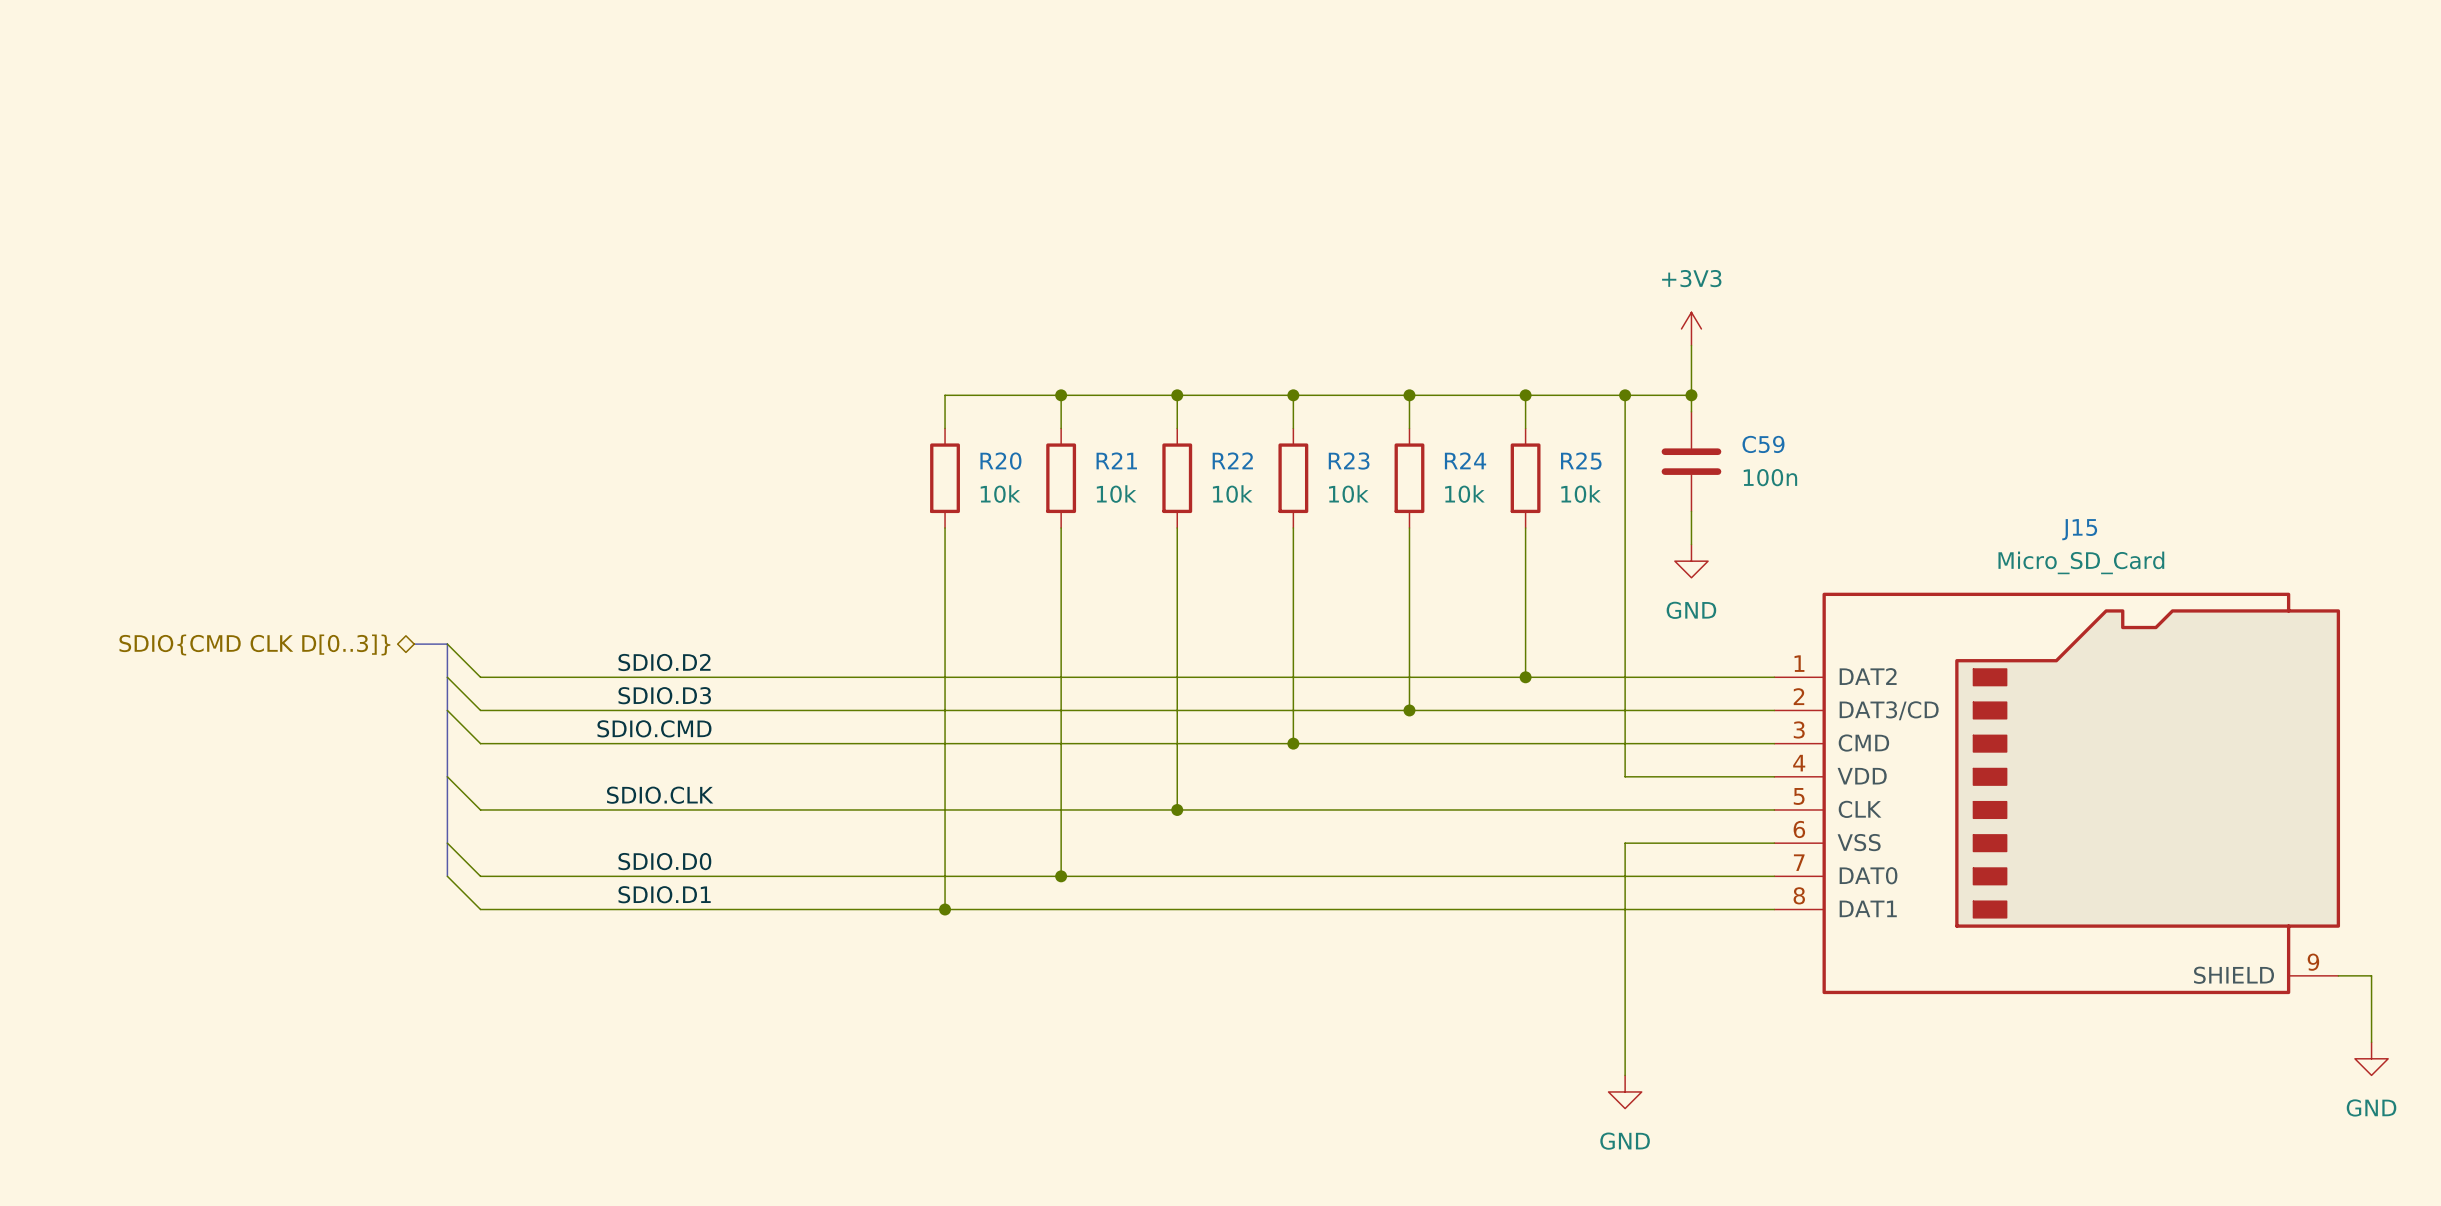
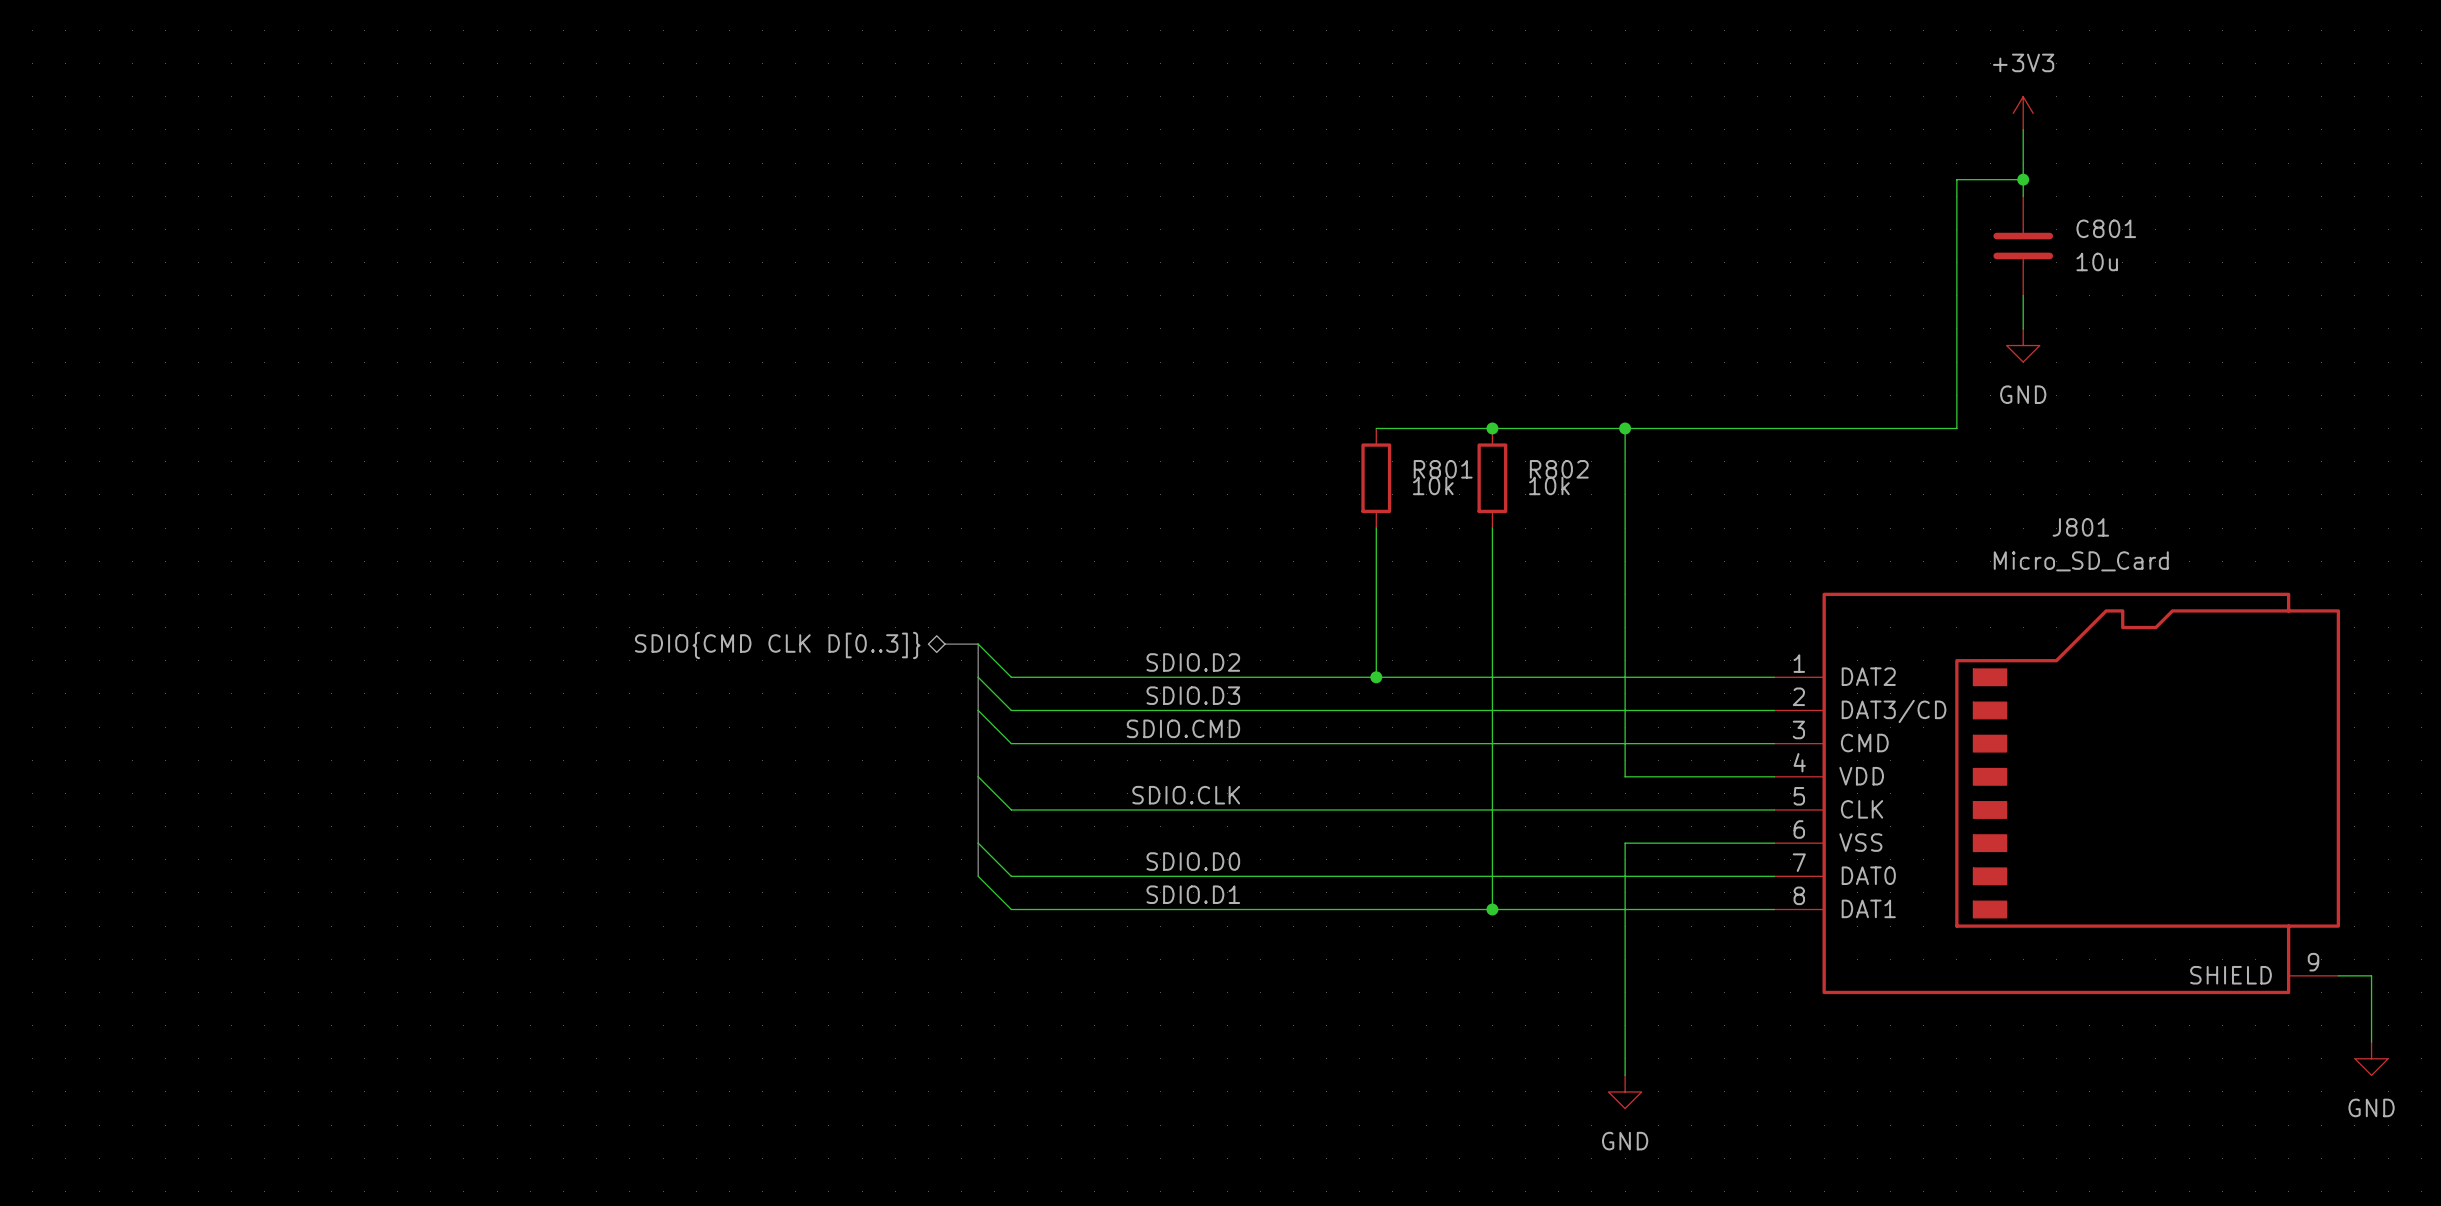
power symbol: none -> +3V3 (2023, 113)
wire: none -> (2023, 129) (2023, 196)
wire: none -> (2023, 179) (1956, 179) (1956, 428) (1376, 428)
junction: none -> (2023, 179)
C801: none -> 10u (2023, 246)
wire: none -> (2023, 295) (2023, 328)
power symbol: +3V3 (1691, 328) -> none
wire: (1691, 345) (1691, 411) -> none
power symbol: none -> GND (2023, 345)
wire: (1061, 395) (1061, 428) -> none
junction: (1061, 395) -> none
wire: (1177, 395) (1177, 428) -> none
junction: (1177, 395) -> none
wire: (1293, 395) (1293, 428) -> none
junction: (1293, 395) -> none
wire: (1409, 395) (1409, 428) -> none
junction: (1409, 395) -> none
wire: (1525, 395) (1525, 428) -> none
junction: (1525, 395) -> none
wire: (1625, 395) (1625, 428) -> none
junction position: (1625, 395) -> (1625, 428)
wire: (1691, 395) (945, 395) (945, 428) -> none
junction: (1691, 395) -> none
junction: none -> (1492, 428)
C59: 100n (1691, 461) -> none
R20: 10k (945, 478) -> none
R21: 10k (1061, 478) -> none
R22: 10k (1177, 478) -> none
R23: 10k (1293, 478) -> none
R801: none -> 10k (1376, 478)
R24: 10k (1409, 478) -> none
R802: none -> 10k (1492, 478)
R25: 10k (1525, 478) -> none
wire: (1691, 511) (1691, 544) -> none
wire: (945, 528) (945, 909) -> none
wire: (1061, 528) (1061, 876) -> none
wire: (1177, 528) (1177, 809) -> none
wire: (1293, 528) (1293, 743) -> none
wire: (1409, 528) (1409, 710) -> none
wire: none -> (1492, 528) (1492, 909)
wire: (1525, 528) (1525, 677) -> (1376, 528) (1376, 677)
J15 name: J15 (2079, 529) -> J801 (2080, 527)
power symbol: GND (1691, 561) -> none
bus: (414, 644) (447, 644) (447, 876) -> none
wire: (447, 644) (480, 677) (1011, 677) -> (978, 644) (1011, 677)
bus: none -> (945, 644) (978, 644) (978, 876)
hierarchical label: SDIO{CMD CLK D[0..3]} (254, 645) -> none
hierarchical label: none -> SDIO{CMD CLK D[0..3]} (777, 645)
label: SDIO.D2 (664, 662) -> none
label: none -> SDIO.D2 (1193, 662)
wire: (447, 677) (480, 710) (1011, 710) -> (978, 677) (1011, 710)
junction: (1525, 677) -> none
label: SDIO.D3 (664, 695) -> none
label: none -> SDIO.D3 (1193, 695)
wire: (447, 710) (480, 743) (1011, 743) -> (978, 710) (1011, 743)
junction position: (1409, 710) -> (1376, 677)
label: SDIO.CMD (654, 728) -> none
label: none -> SDIO.CMD (1183, 728)
junction: (1293, 743) -> none
wire: (447, 776) (480, 809) (1011, 809) -> (978, 776) (1011, 809)
label: SDIO.CLK (660, 795) -> none
label: none -> SDIO.CLK (1186, 795)
junction: (1177, 809) -> none
wire: (447, 843) (480, 876) (1011, 876) -> (978, 843) (1011, 876)
label: SDIO.D0 (664, 861) -> none
label: none -> SDIO.D0 (1193, 861)
wire: (447, 876) (480, 909) (1011, 909) -> (978, 876) (1011, 909)
junction: (1061, 876) -> none
label: SDIO.D1 (664, 894) -> none
label: none -> SDIO.D1 (1193, 894)
junction: (945, 909) -> none
junction: none -> (1492, 909)

